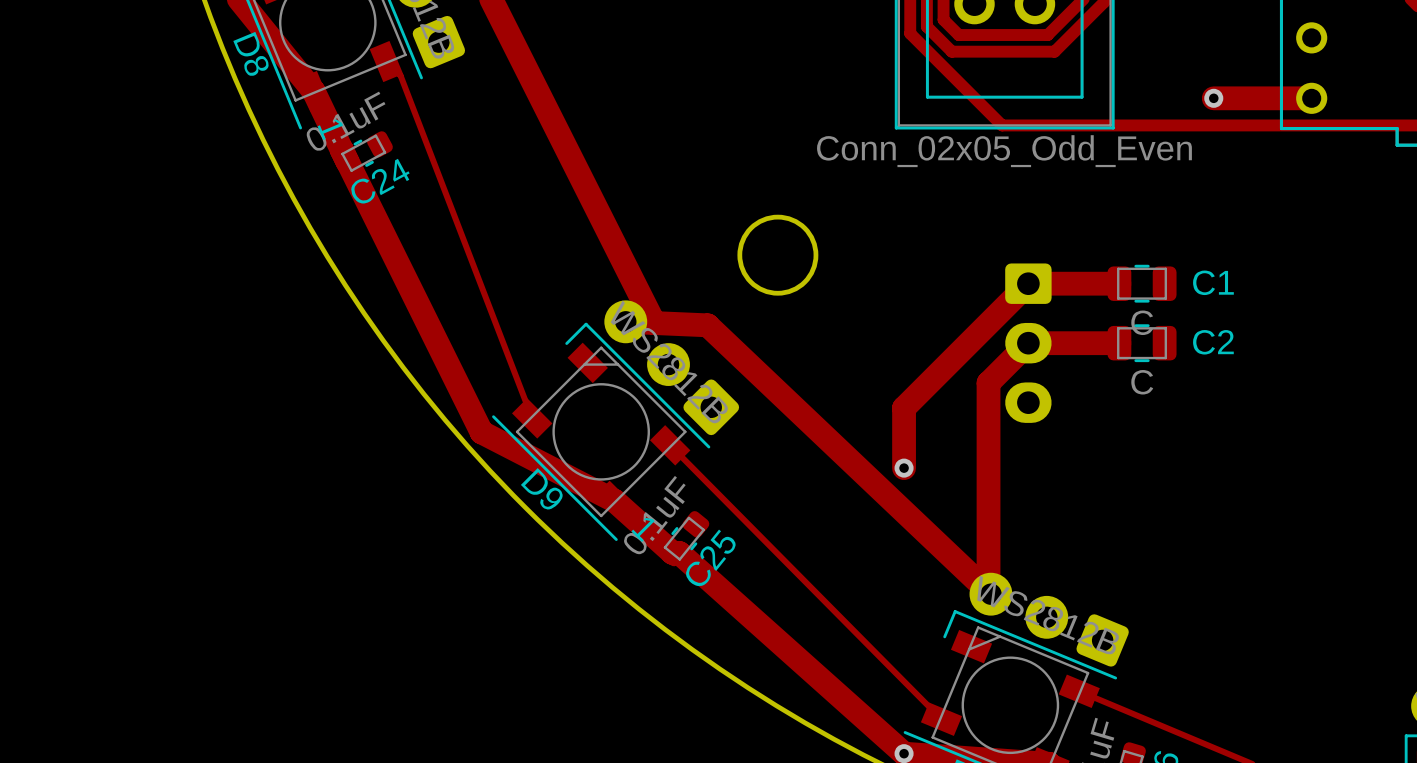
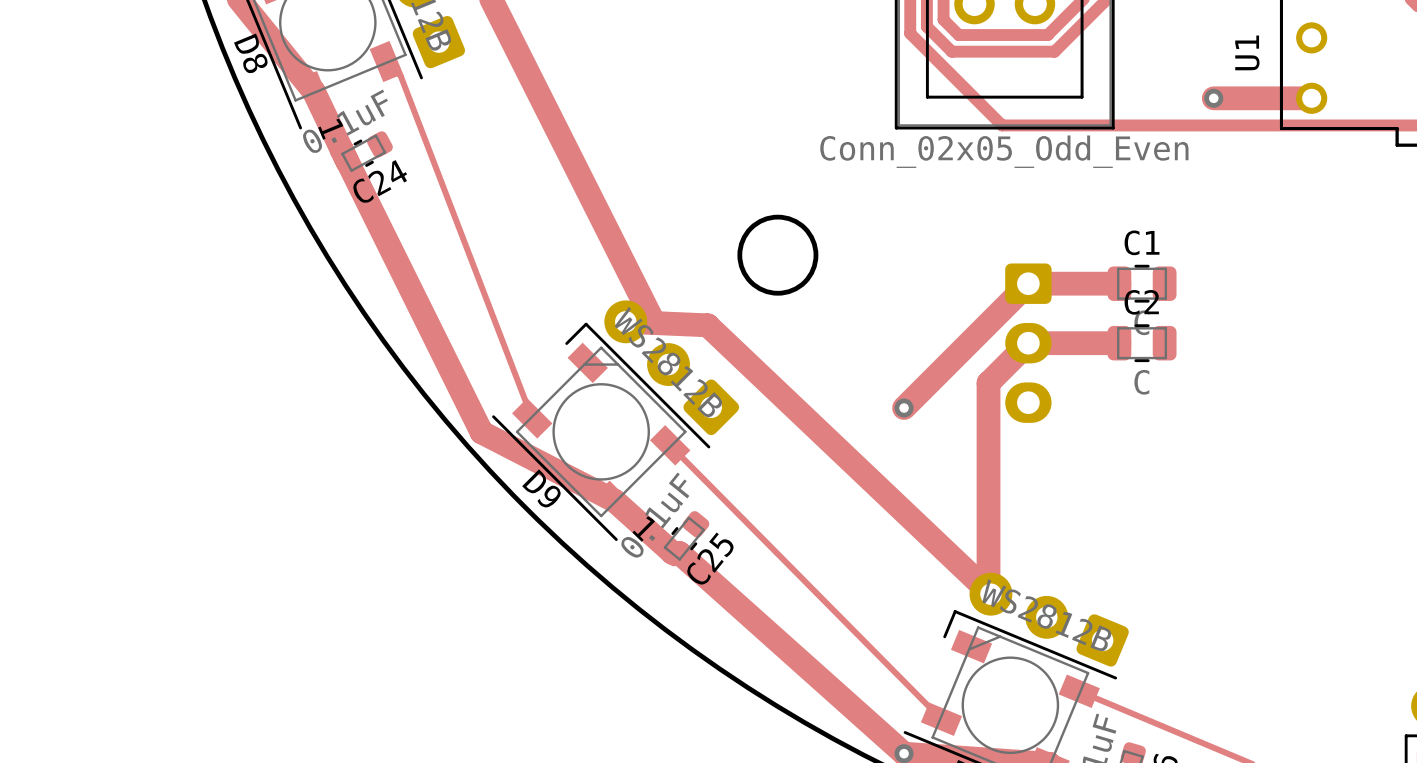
U1 name: none -> U1 (1247, 52)
C1 name position: C1 (1213, 282) -> C1 (1142, 242)
C2 name position: C2 (1213, 342) -> C2 (1141, 302)
track: (904, 408) (904, 468) -> none
via position: (904, 468) -> (904, 408)

